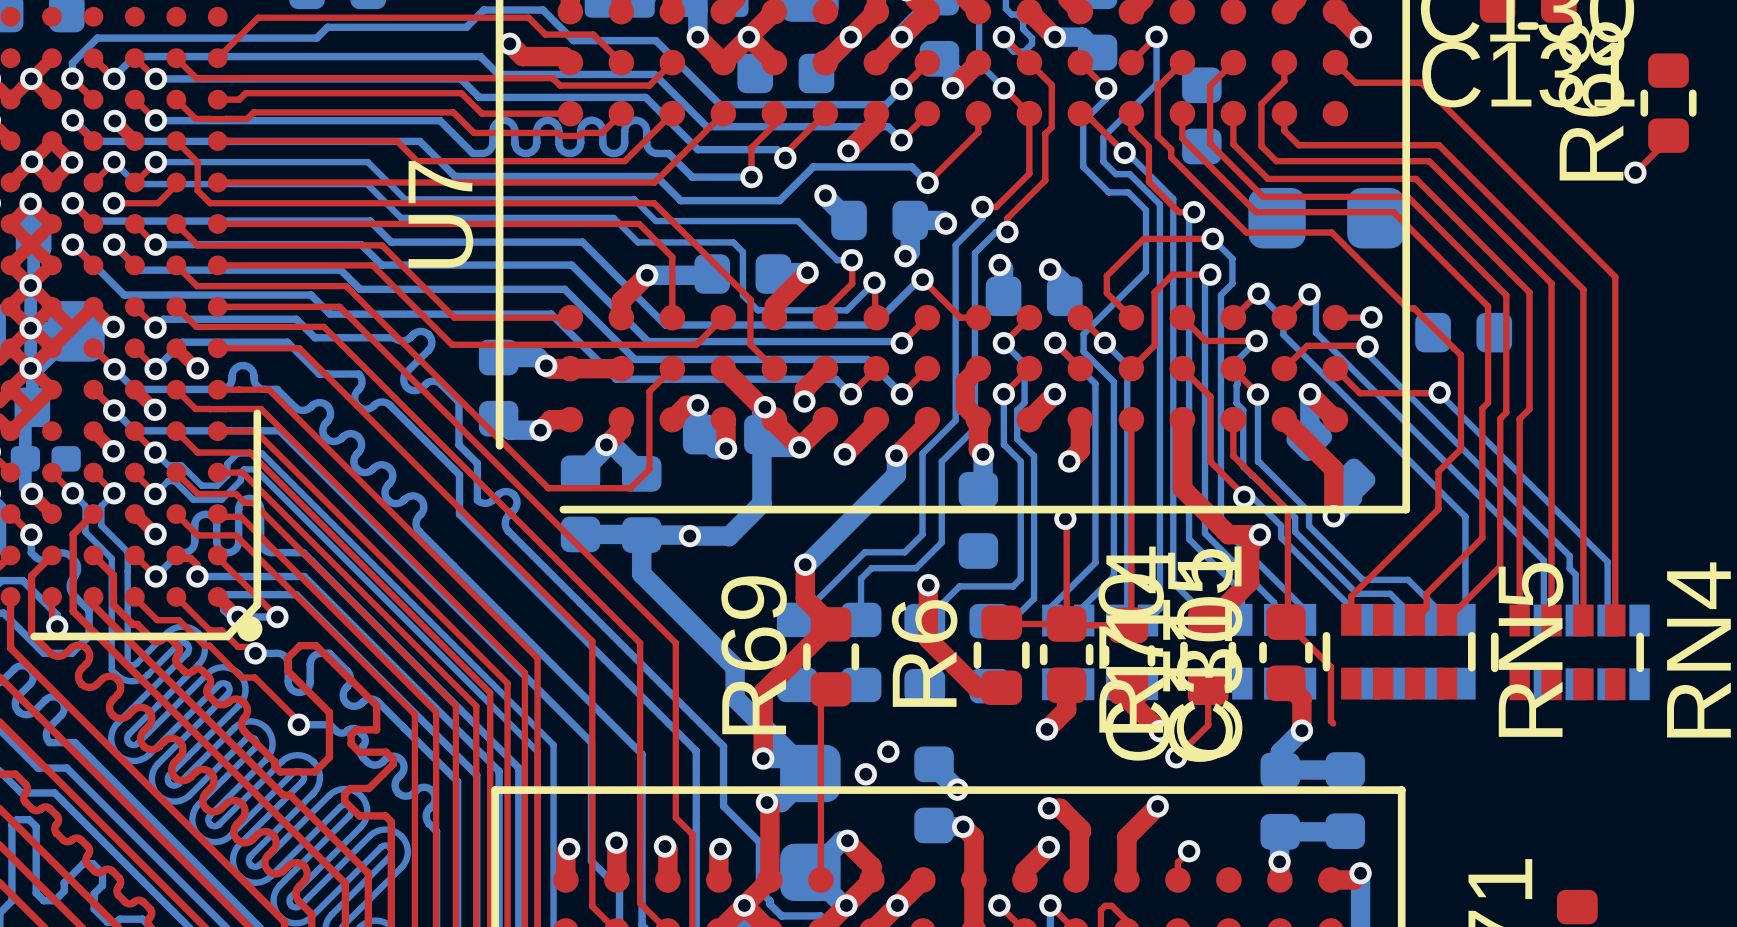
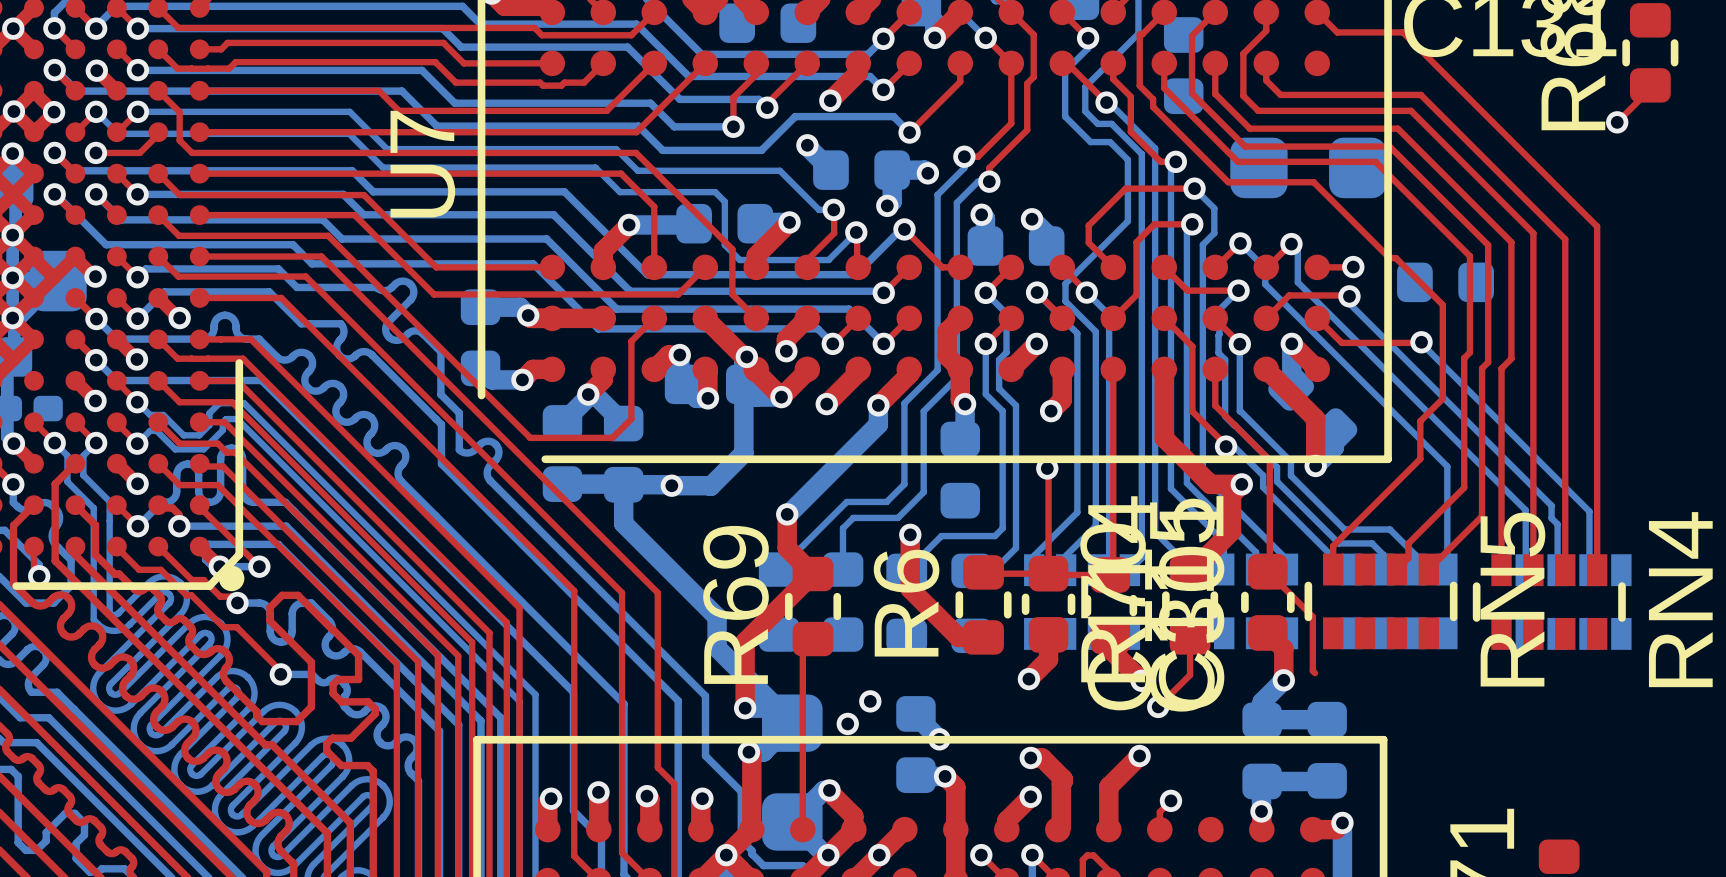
bottom track: (481, 153) (491, 148) (493, 127) (497, 122) (503, 120) (513, 125) (515, 146) (522, 153) (528, 153) (534, 149) (537, 127) (542, 121) (547, 120) (553, 121) (557, 127) (561, 149) (566, 153) (573, 152) (580, 145) (582, 125) (591, 120) (597, 121) (601, 127) (604, 149) (610, 153) (616, 153) (623, 146) (626, 125) (635, 120) (642, 122) (645, 127) (648, 148) (657, 153) -> (463, 103) (639, 103)

